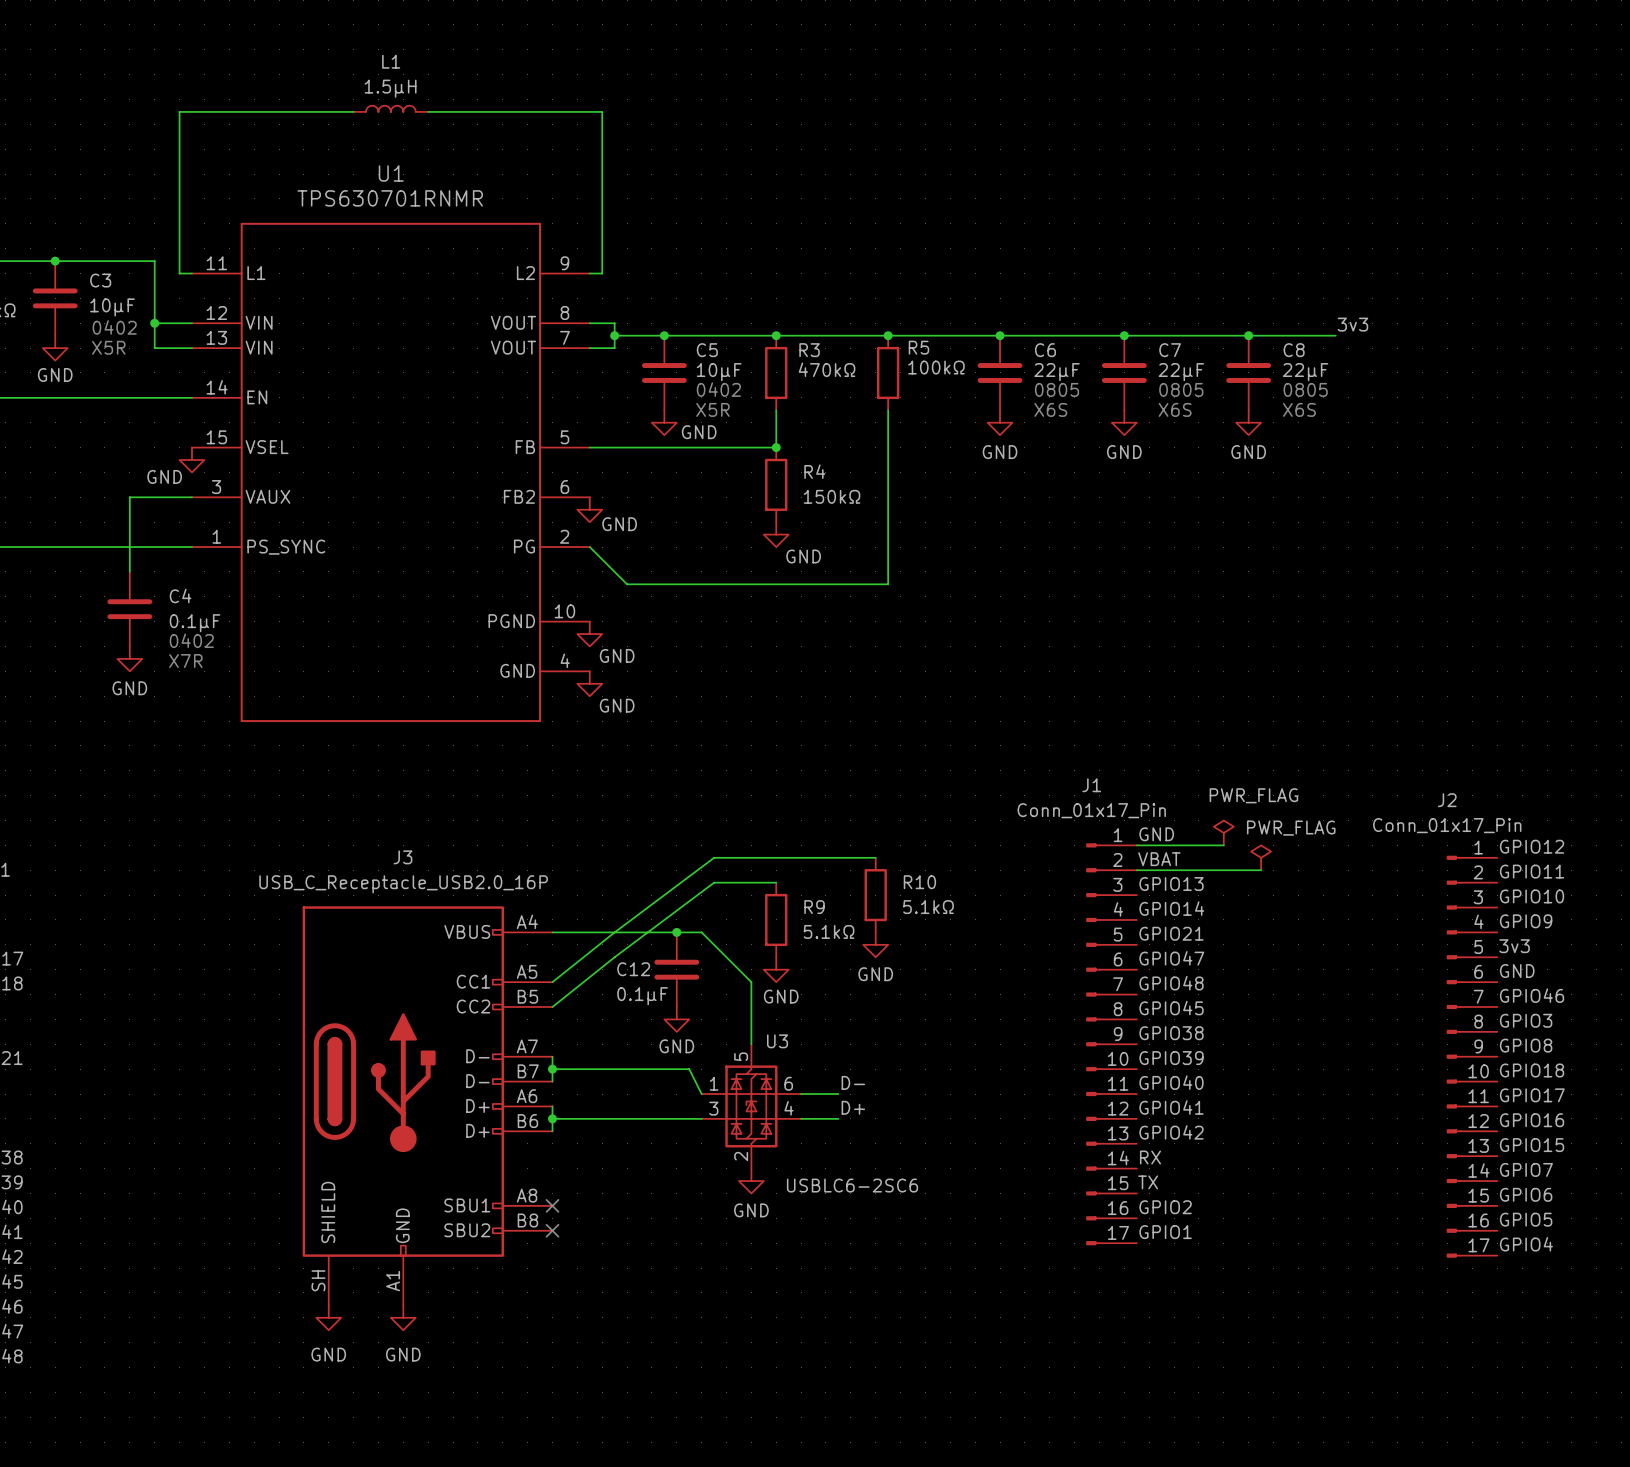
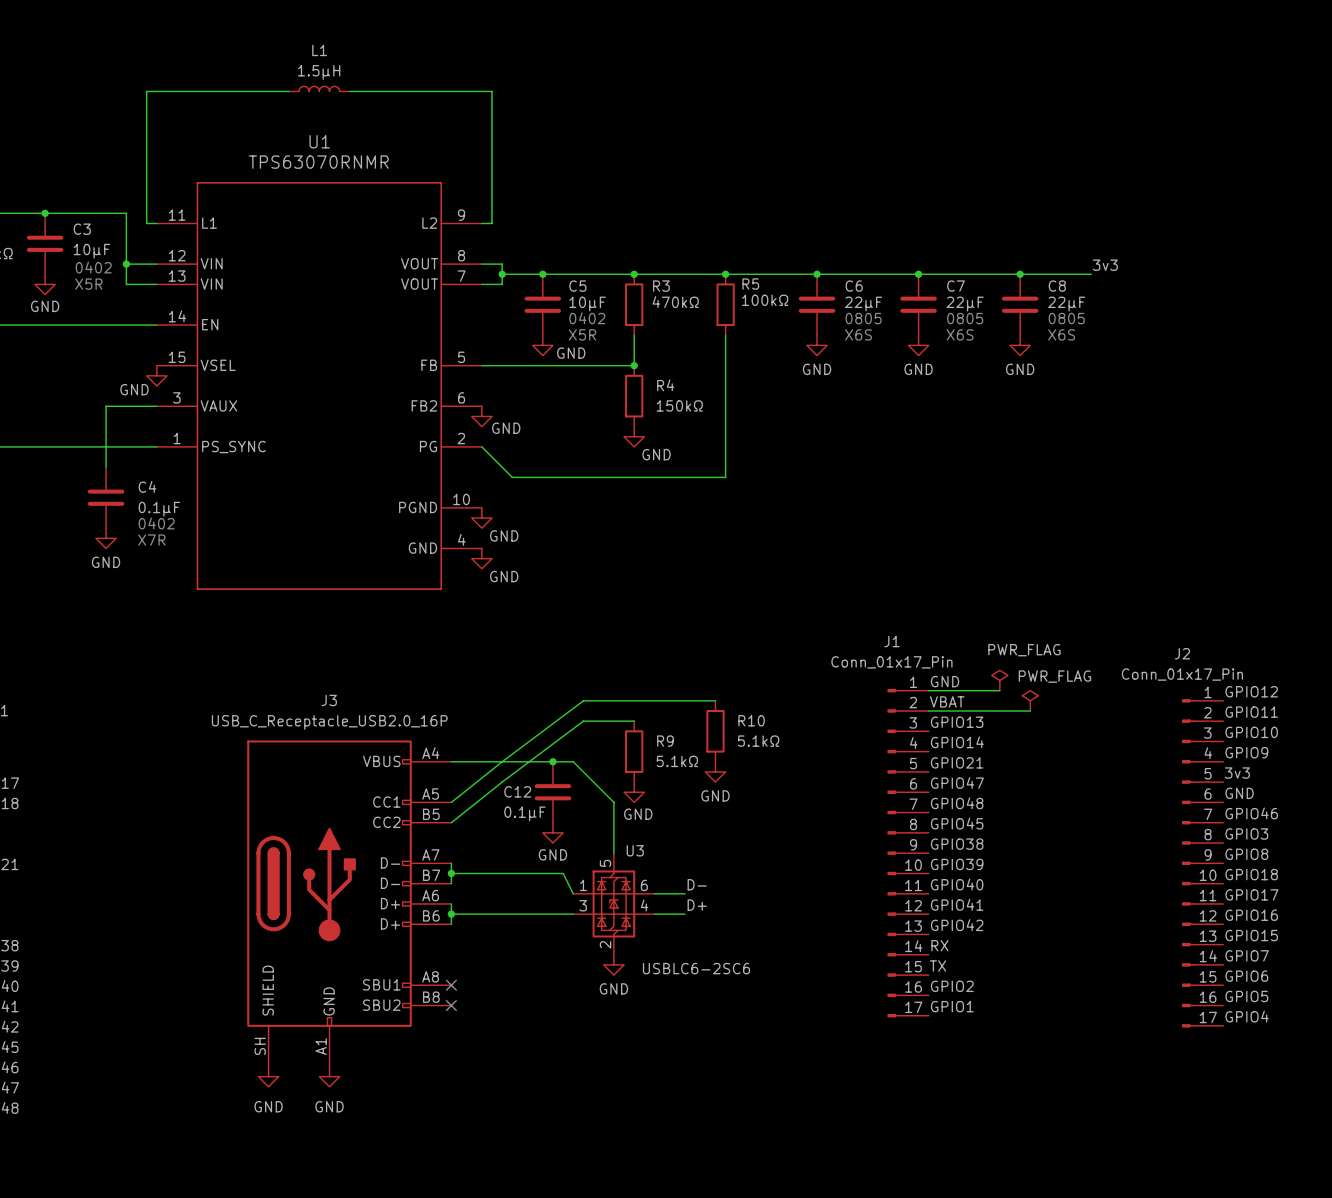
U1 value: TPS630701RNMR (390, 198) -> TPS63070RNMR (318, 162)

